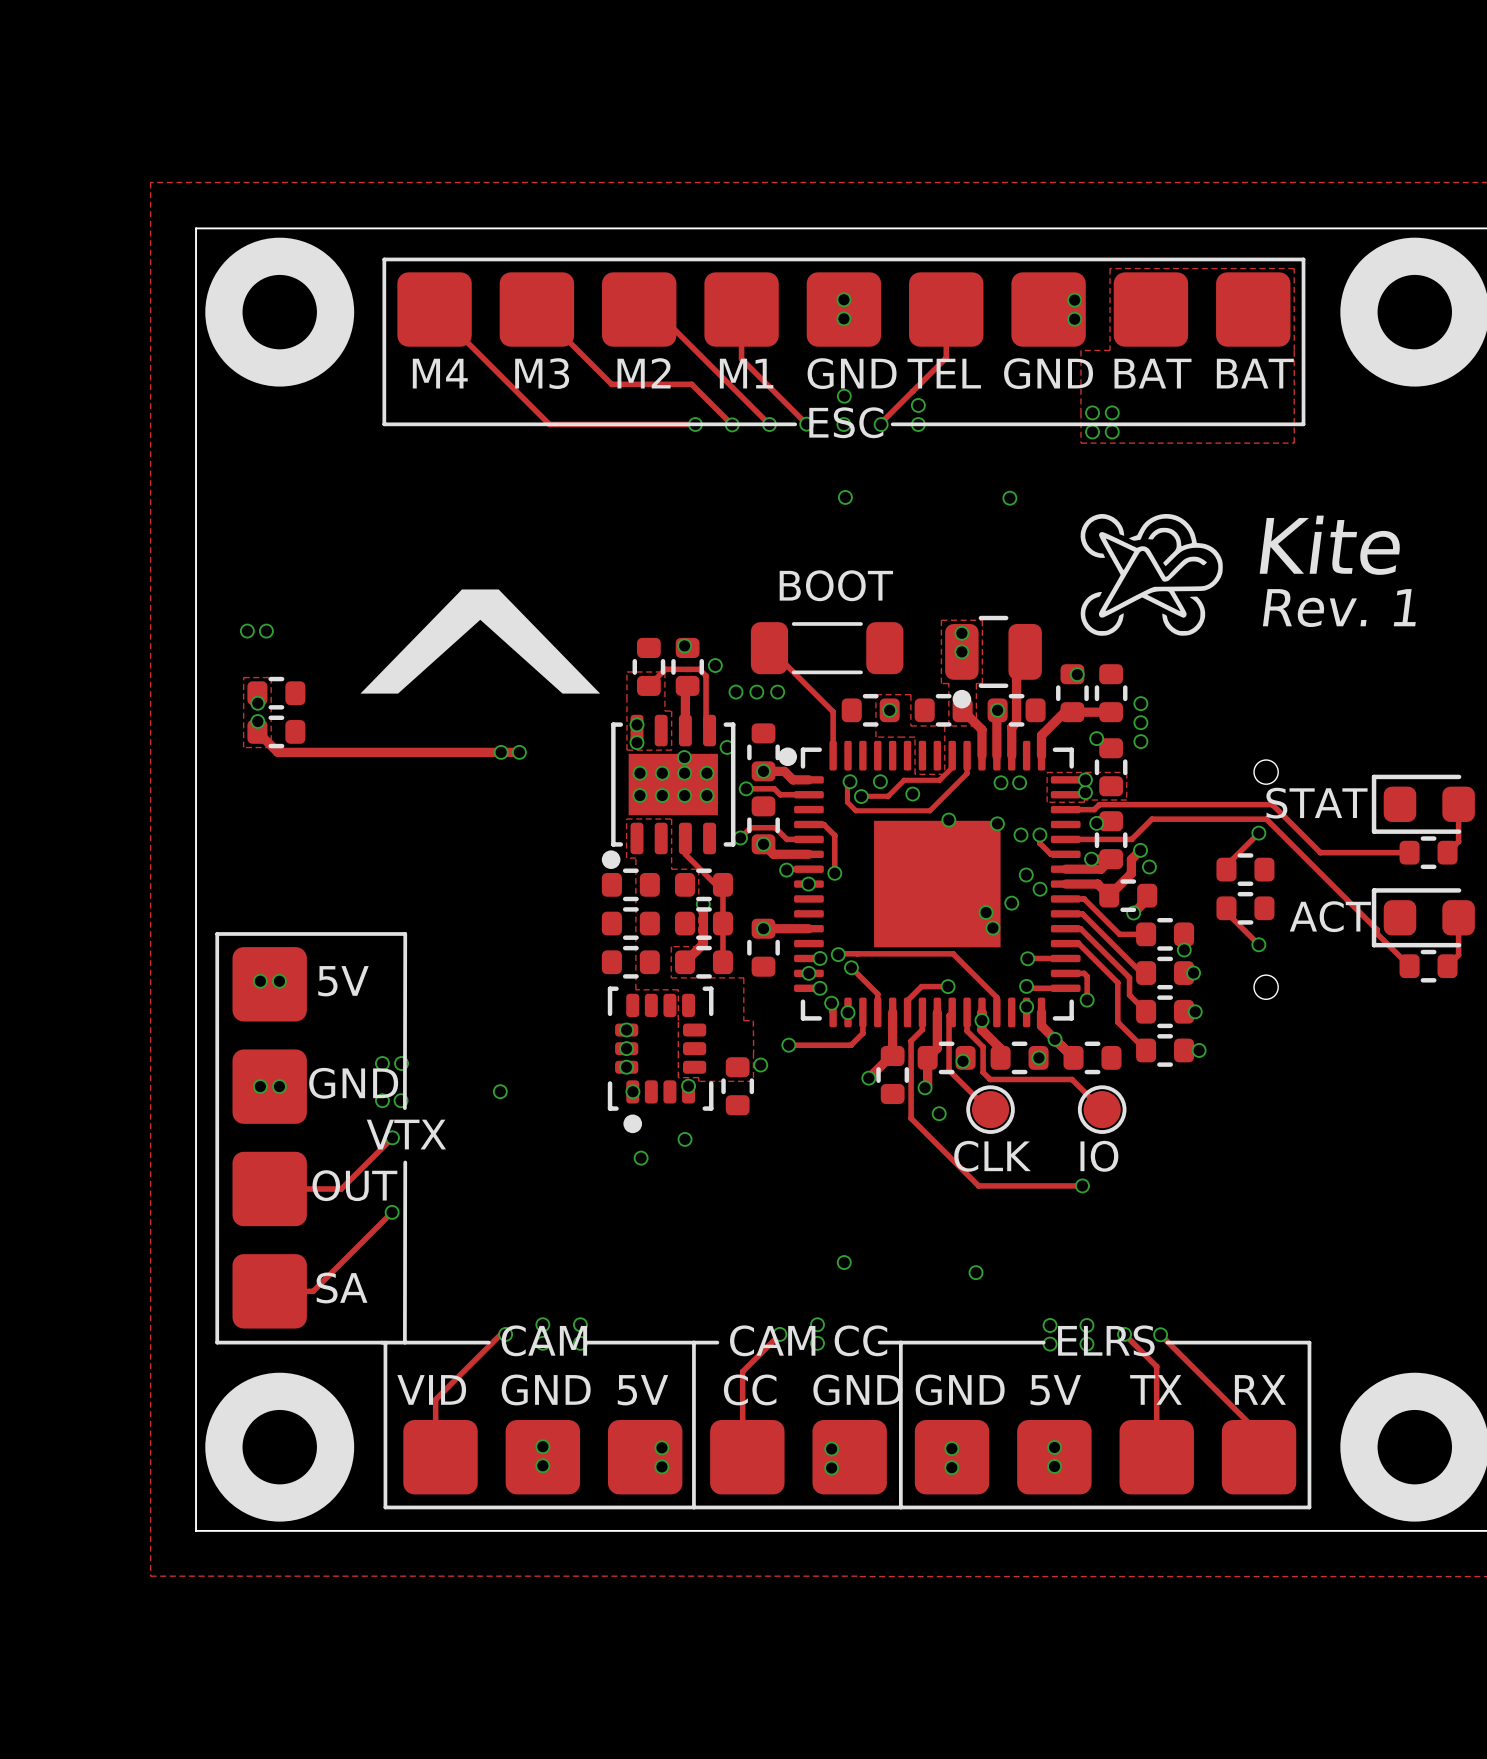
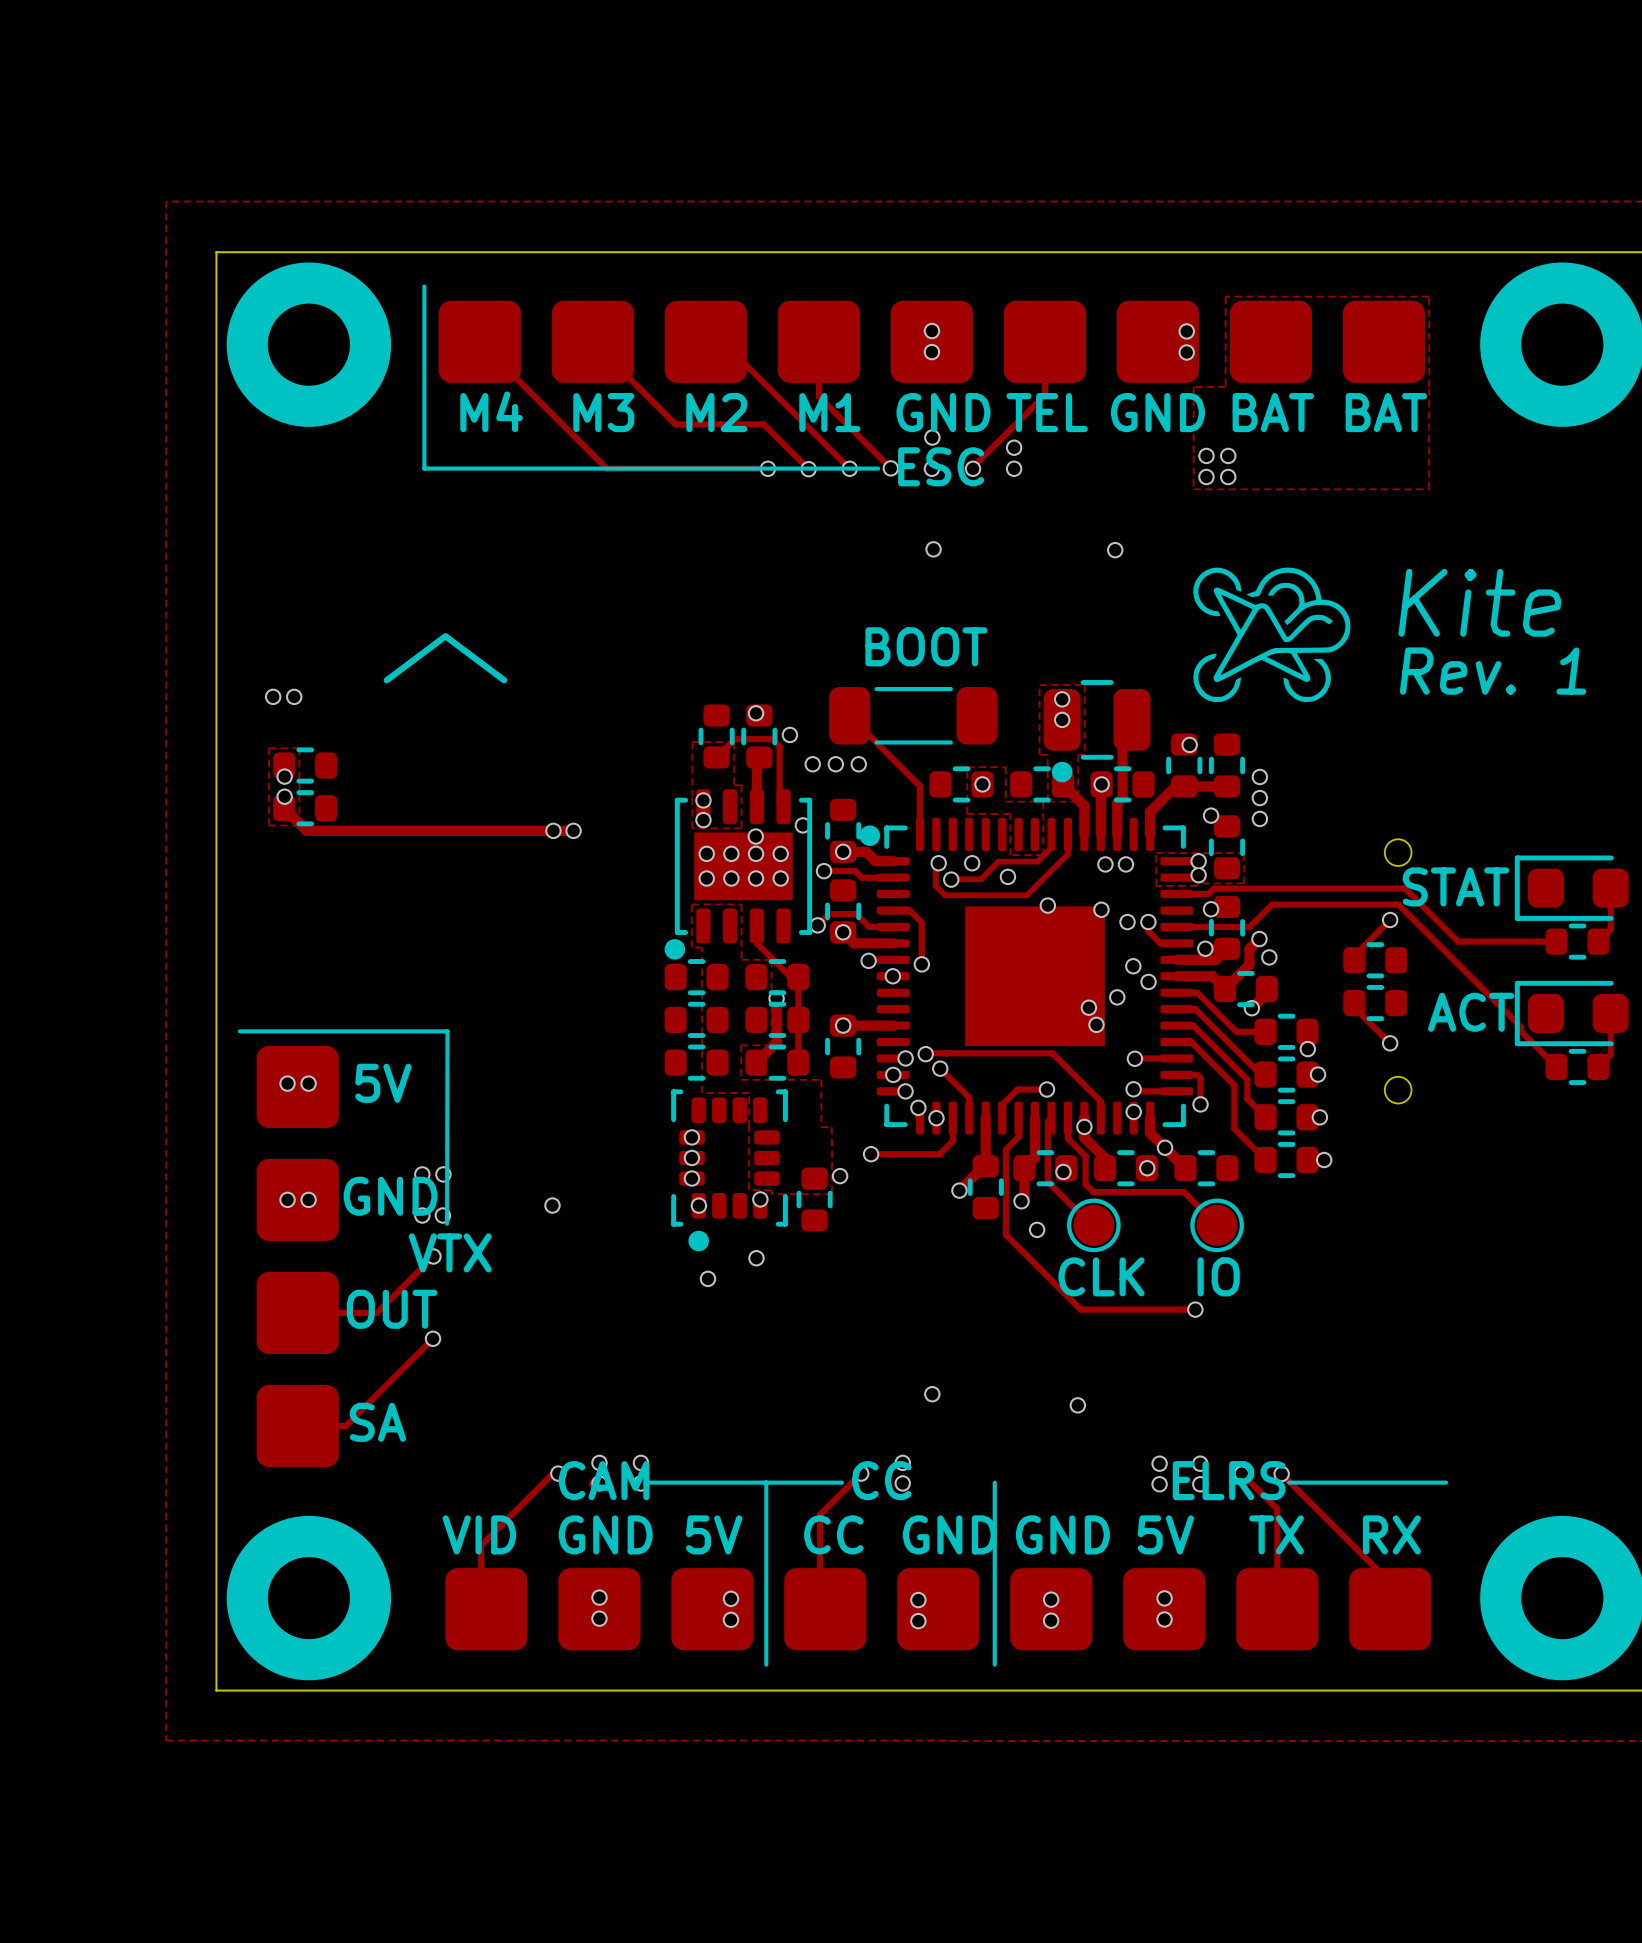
line: (384, 259) (1303, 259) (1303, 424) (892, 424) -> none
line: (217, 933) (217, 1342) (488, 1342) -> none
line: (405, 1162) (404, 1342) -> none
text: none -> CC (881, 1480)
text: CAM CC (808, 1340) -> none
line: (385, 1342) (385, 1507) (1309, 1507) (1309, 1342) -> none
line: none -> (792, 1482) (841, 1482)
line: (879, 1342) (1043, 1342) -> none

